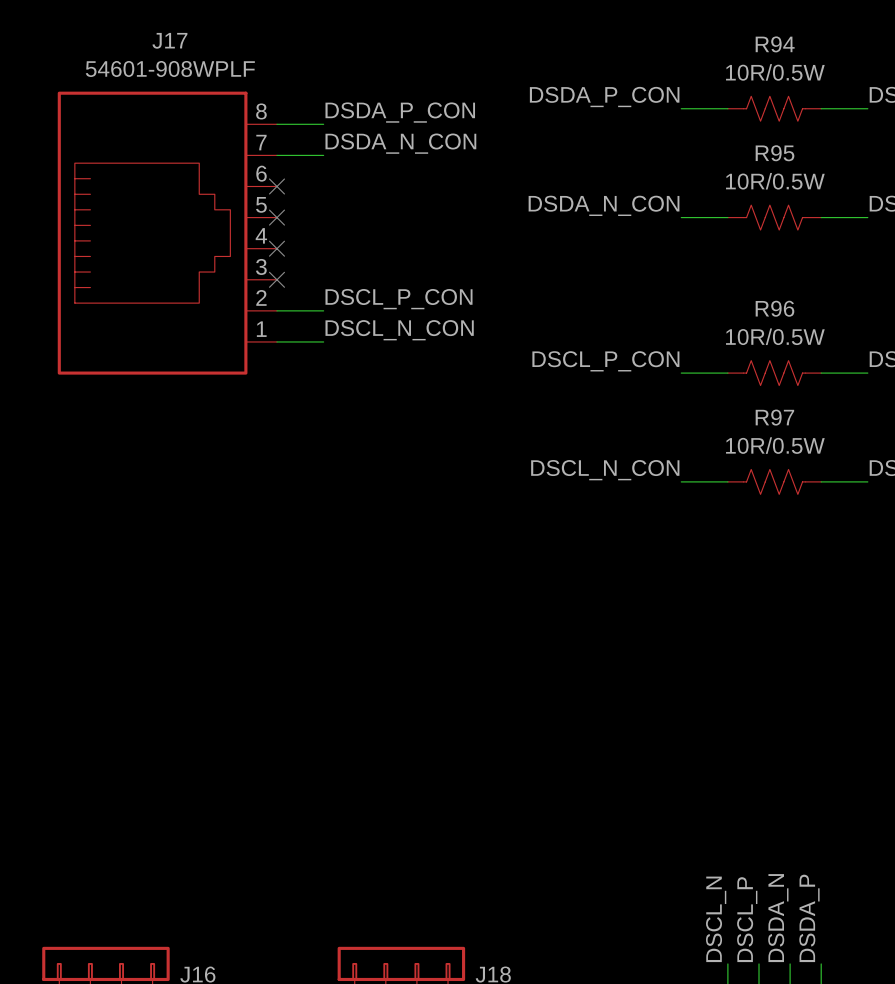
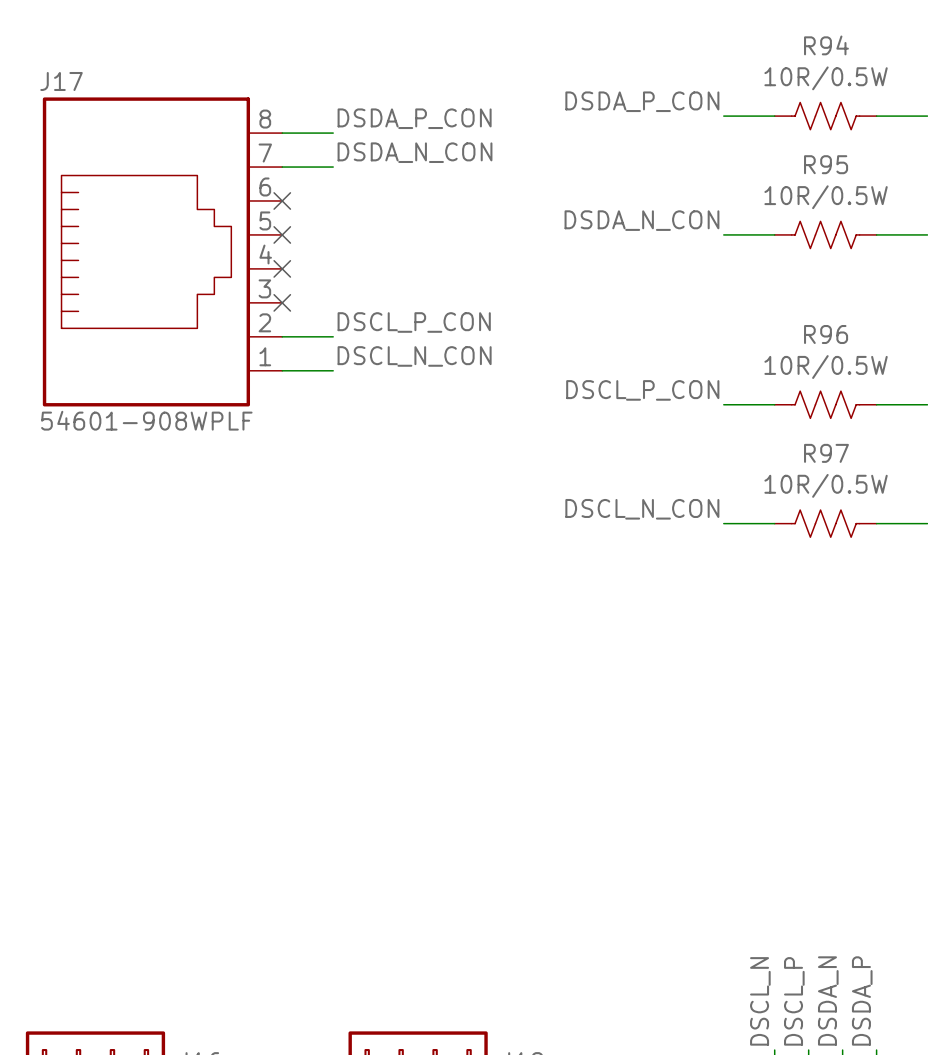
J17 name position: J17 (169, 40) -> J17 (61, 81)
J17 value position: 54601-908WPLF (170, 68) -> 54601-908WPLF (146, 420)

